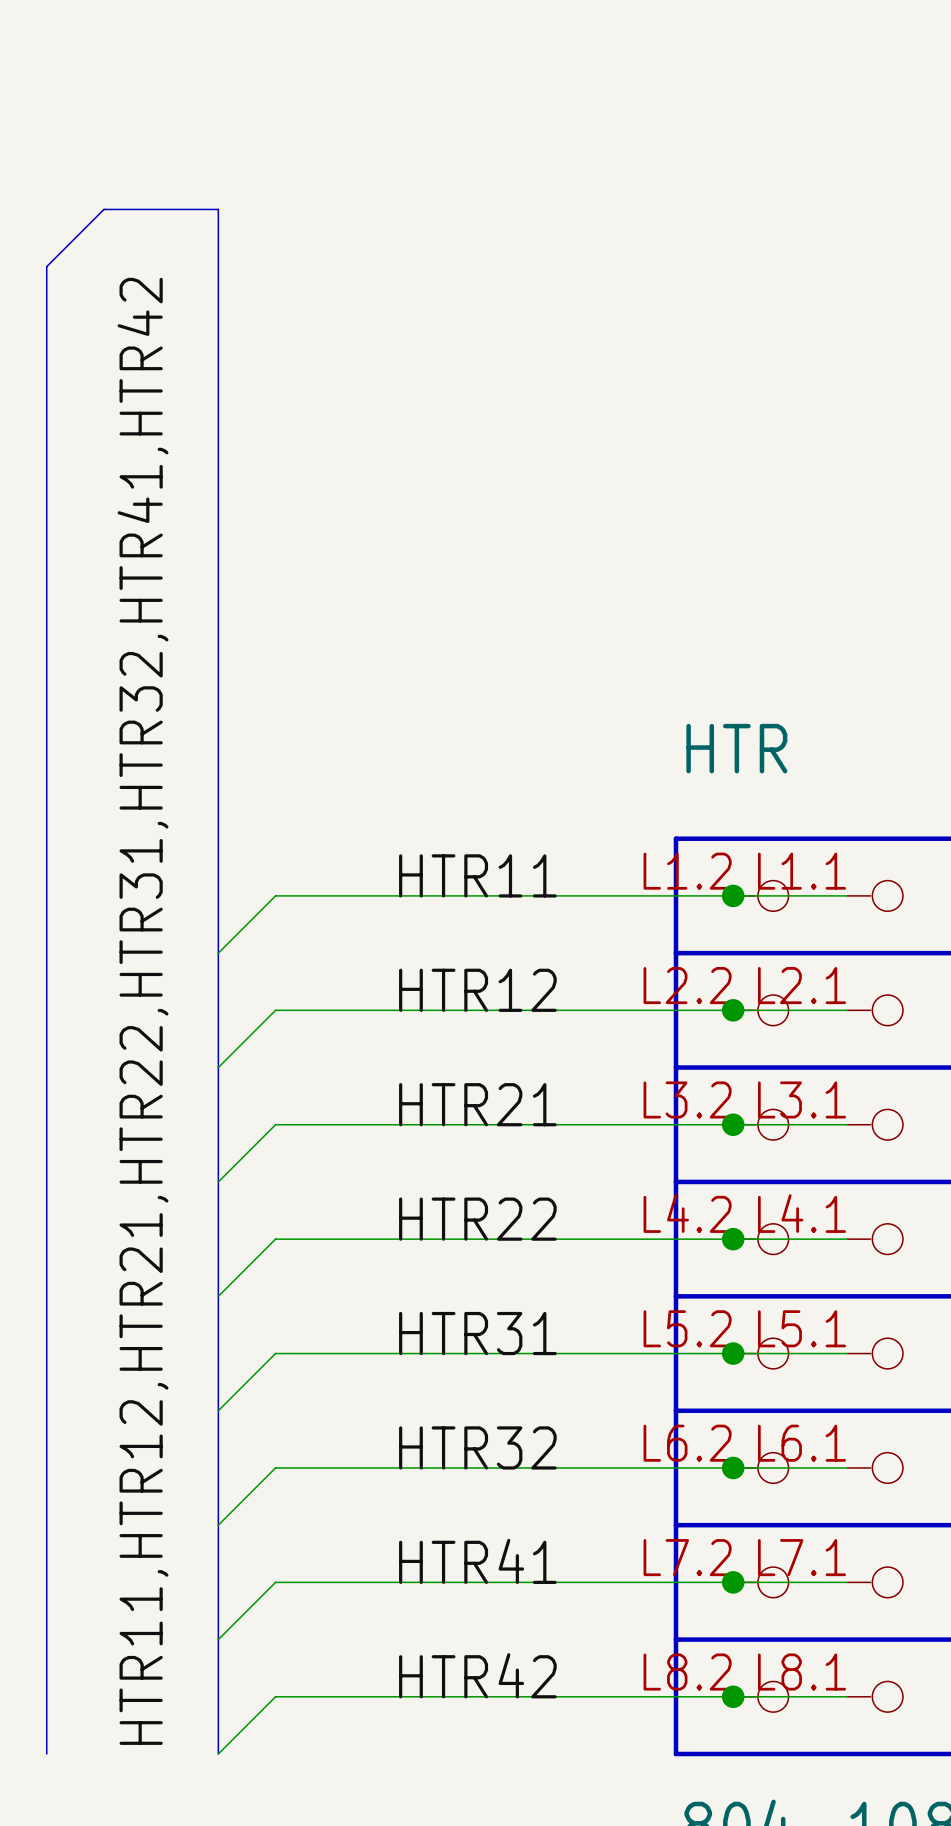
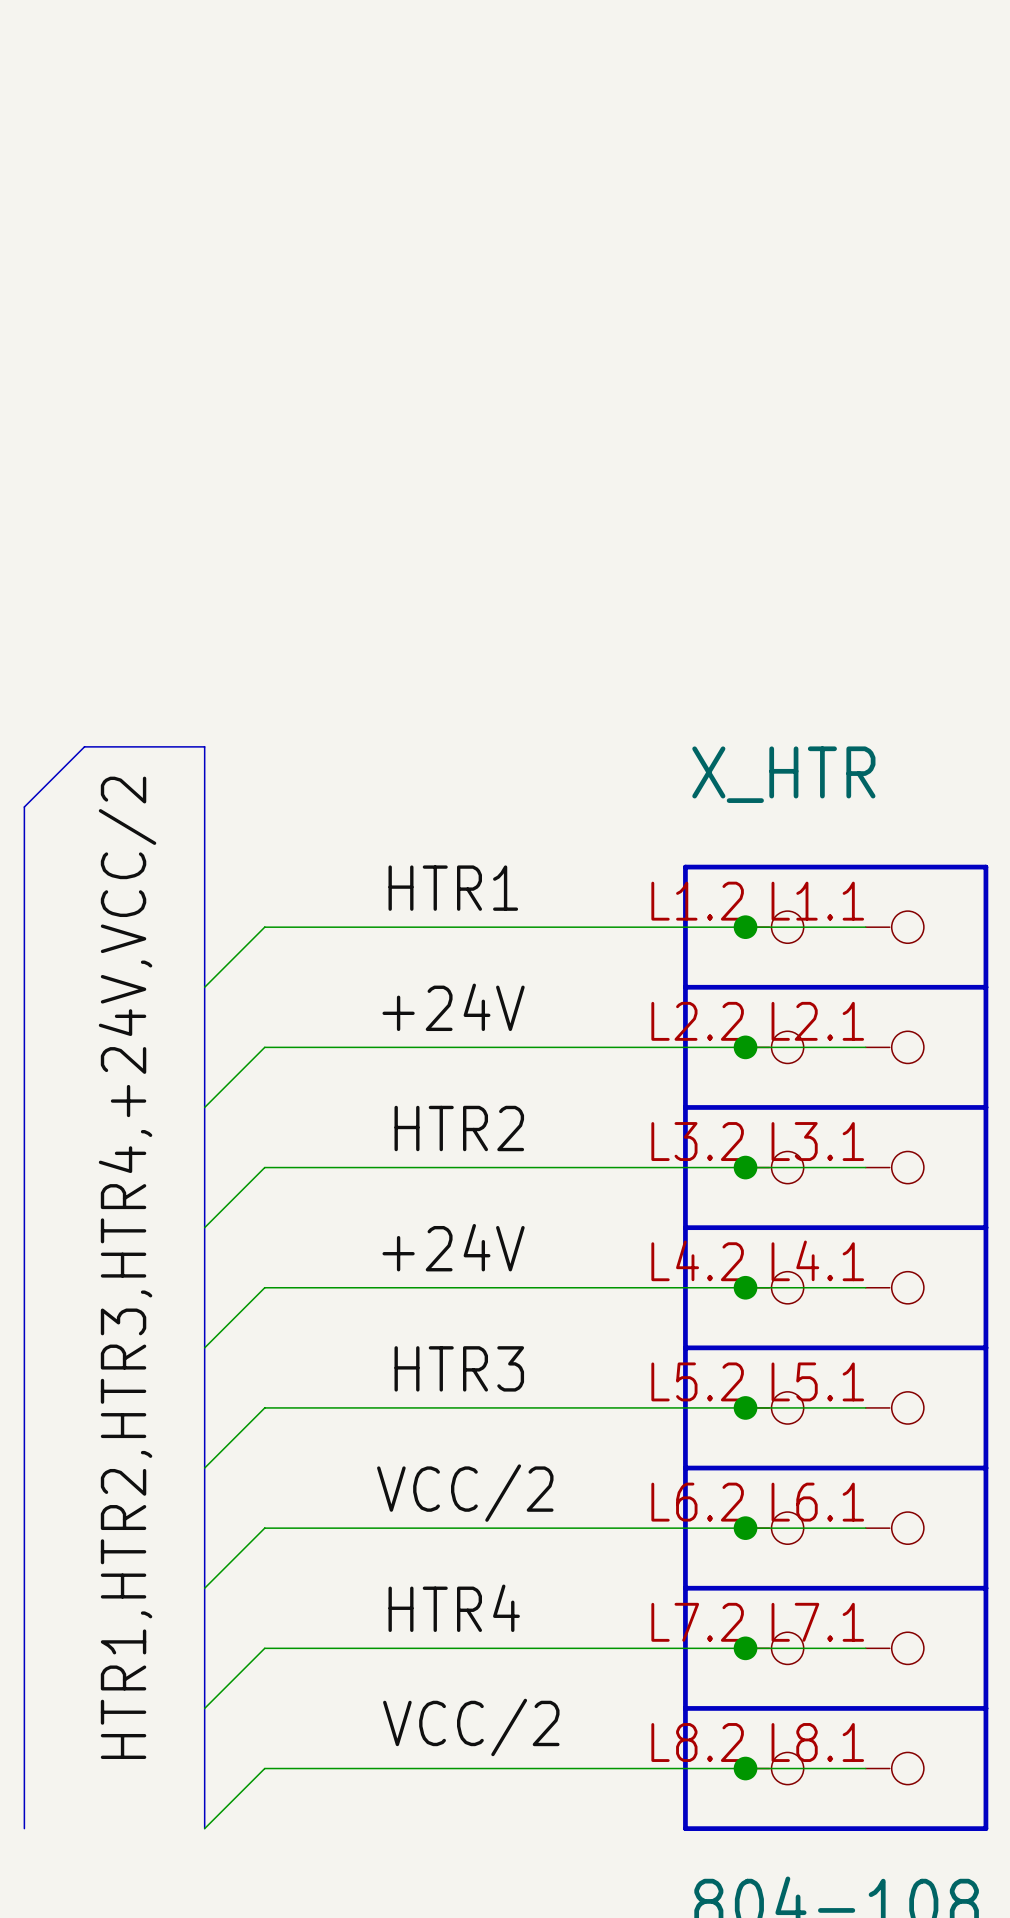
bus: (218, 724) (218, 209) (103, 209) (46, 266) (46, 781) -> (204, 746) (84, 746) (24, 806)
HTR name: HTR (736, 748) -> X_HTR (783, 774)
label: HTR11 (477, 875) -> HTR1 (453, 888)
label: HTR12 (477, 990) -> +24V (453, 1007)
label: HTR11,HTR12,HTR21,HTR22,HTR31,HTR32,HTR41,HTR42 (143, 1011) -> none
label: HTR21 (477, 1104) -> HTR2 (459, 1128)
label: HTR22 (477, 1219) -> +24V (453, 1247)
label: none -> HTR1,HTR2,HTR3,HTR4,+24V,VCC/2 (127, 1267)
label: HTR31 (477, 1333) -> HTR3 (459, 1368)
label: HTR32 (477, 1447) -> VCC/2 (465, 1493)
label: HTR41 (477, 1561) -> HTR4 (454, 1608)
label: none -> VCC/2 (471, 1727)
label: HTR42 (477, 1675) -> none

